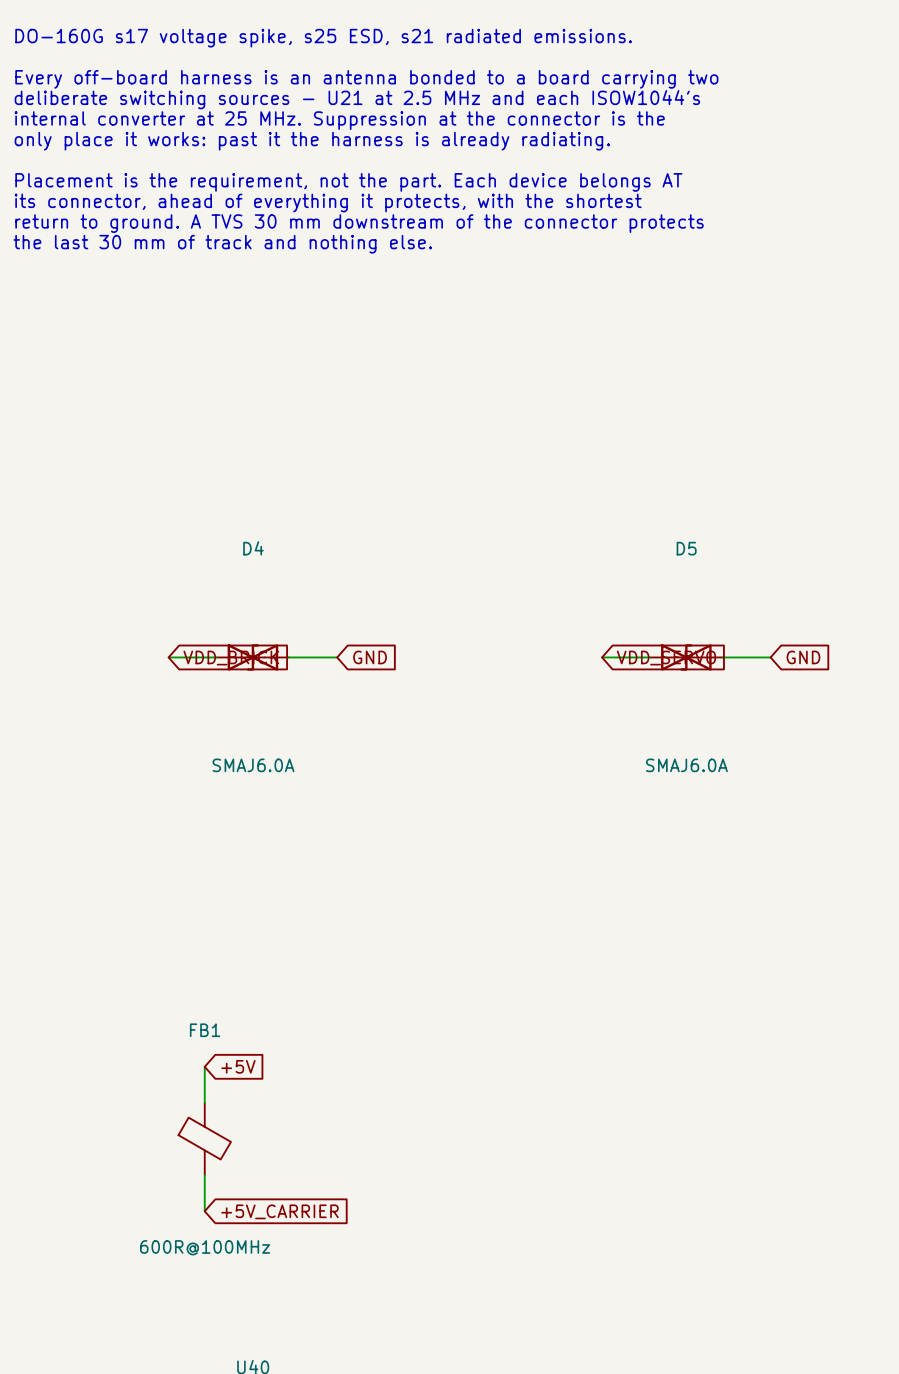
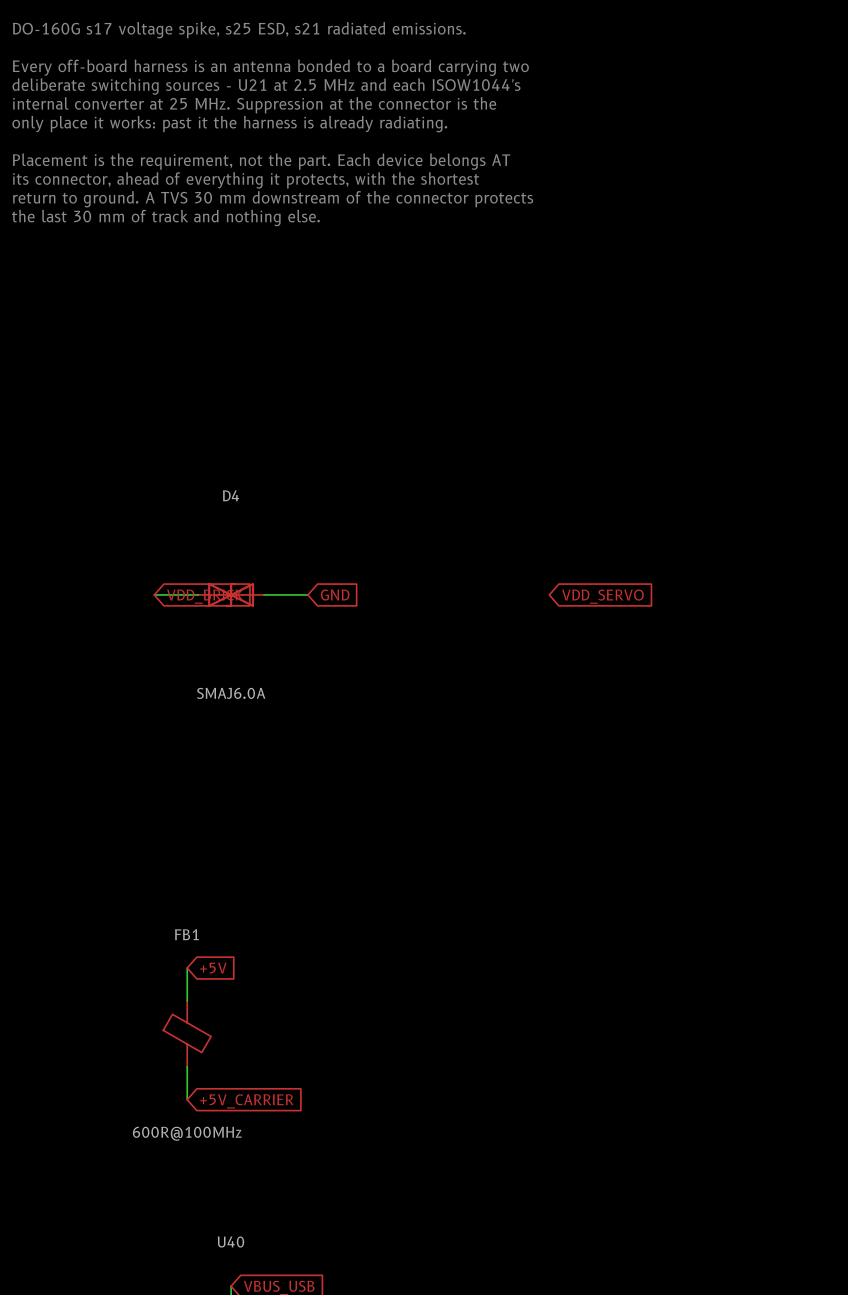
wire: (602, 657) (650, 657) -> none
D5: SMAJ6.0A (686, 657) -> none
wire: (722, 657) (770, 657) -> none
global label: GND (803, 657) -> none

